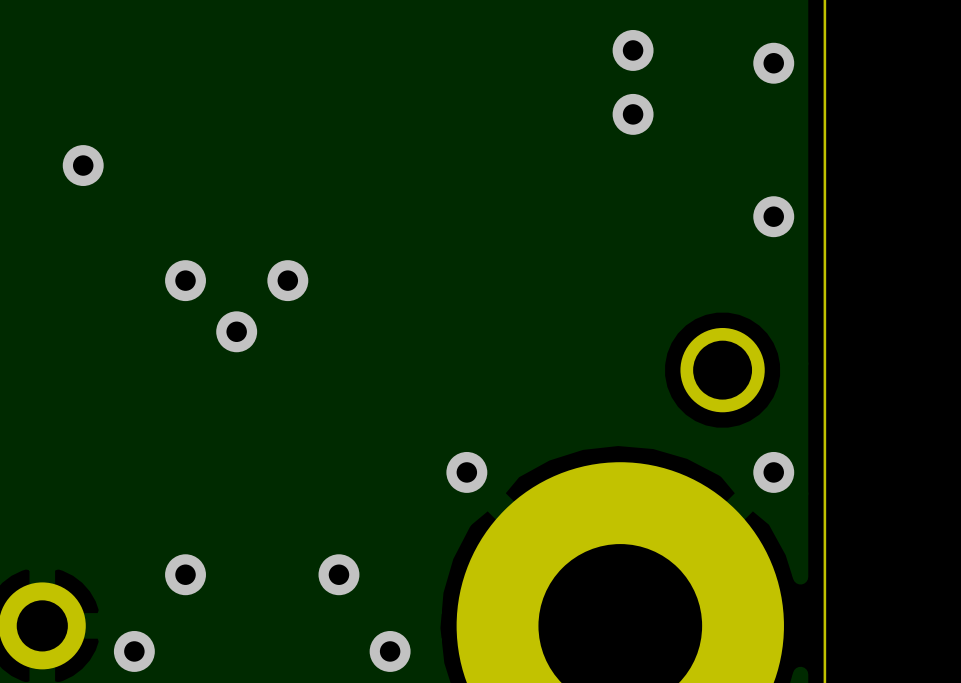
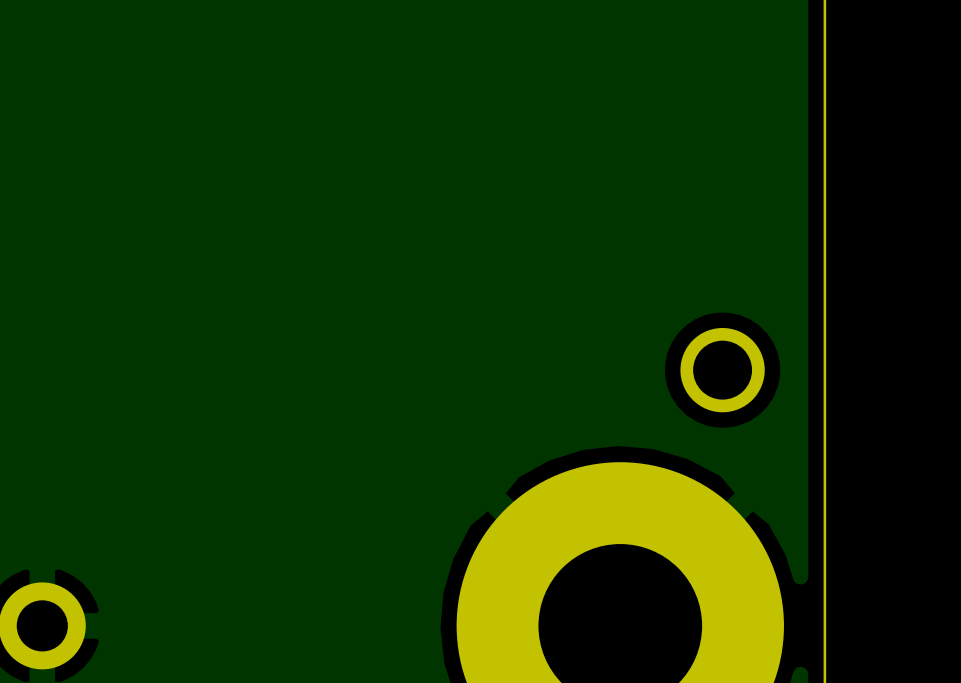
via: (633, 50) -> none
via: (773, 63) -> none
via: (633, 114) -> none
via: (83, 165) -> none
via: (773, 216) -> none
via: (185, 280) -> none
via: (287, 280) -> none
via: (236, 331) -> none
via: (466, 472) -> none
via: (773, 472) -> none
via: (185, 574) -> none
via: (338, 574) -> none
via: (134, 651) -> none
via: (390, 651) -> none

